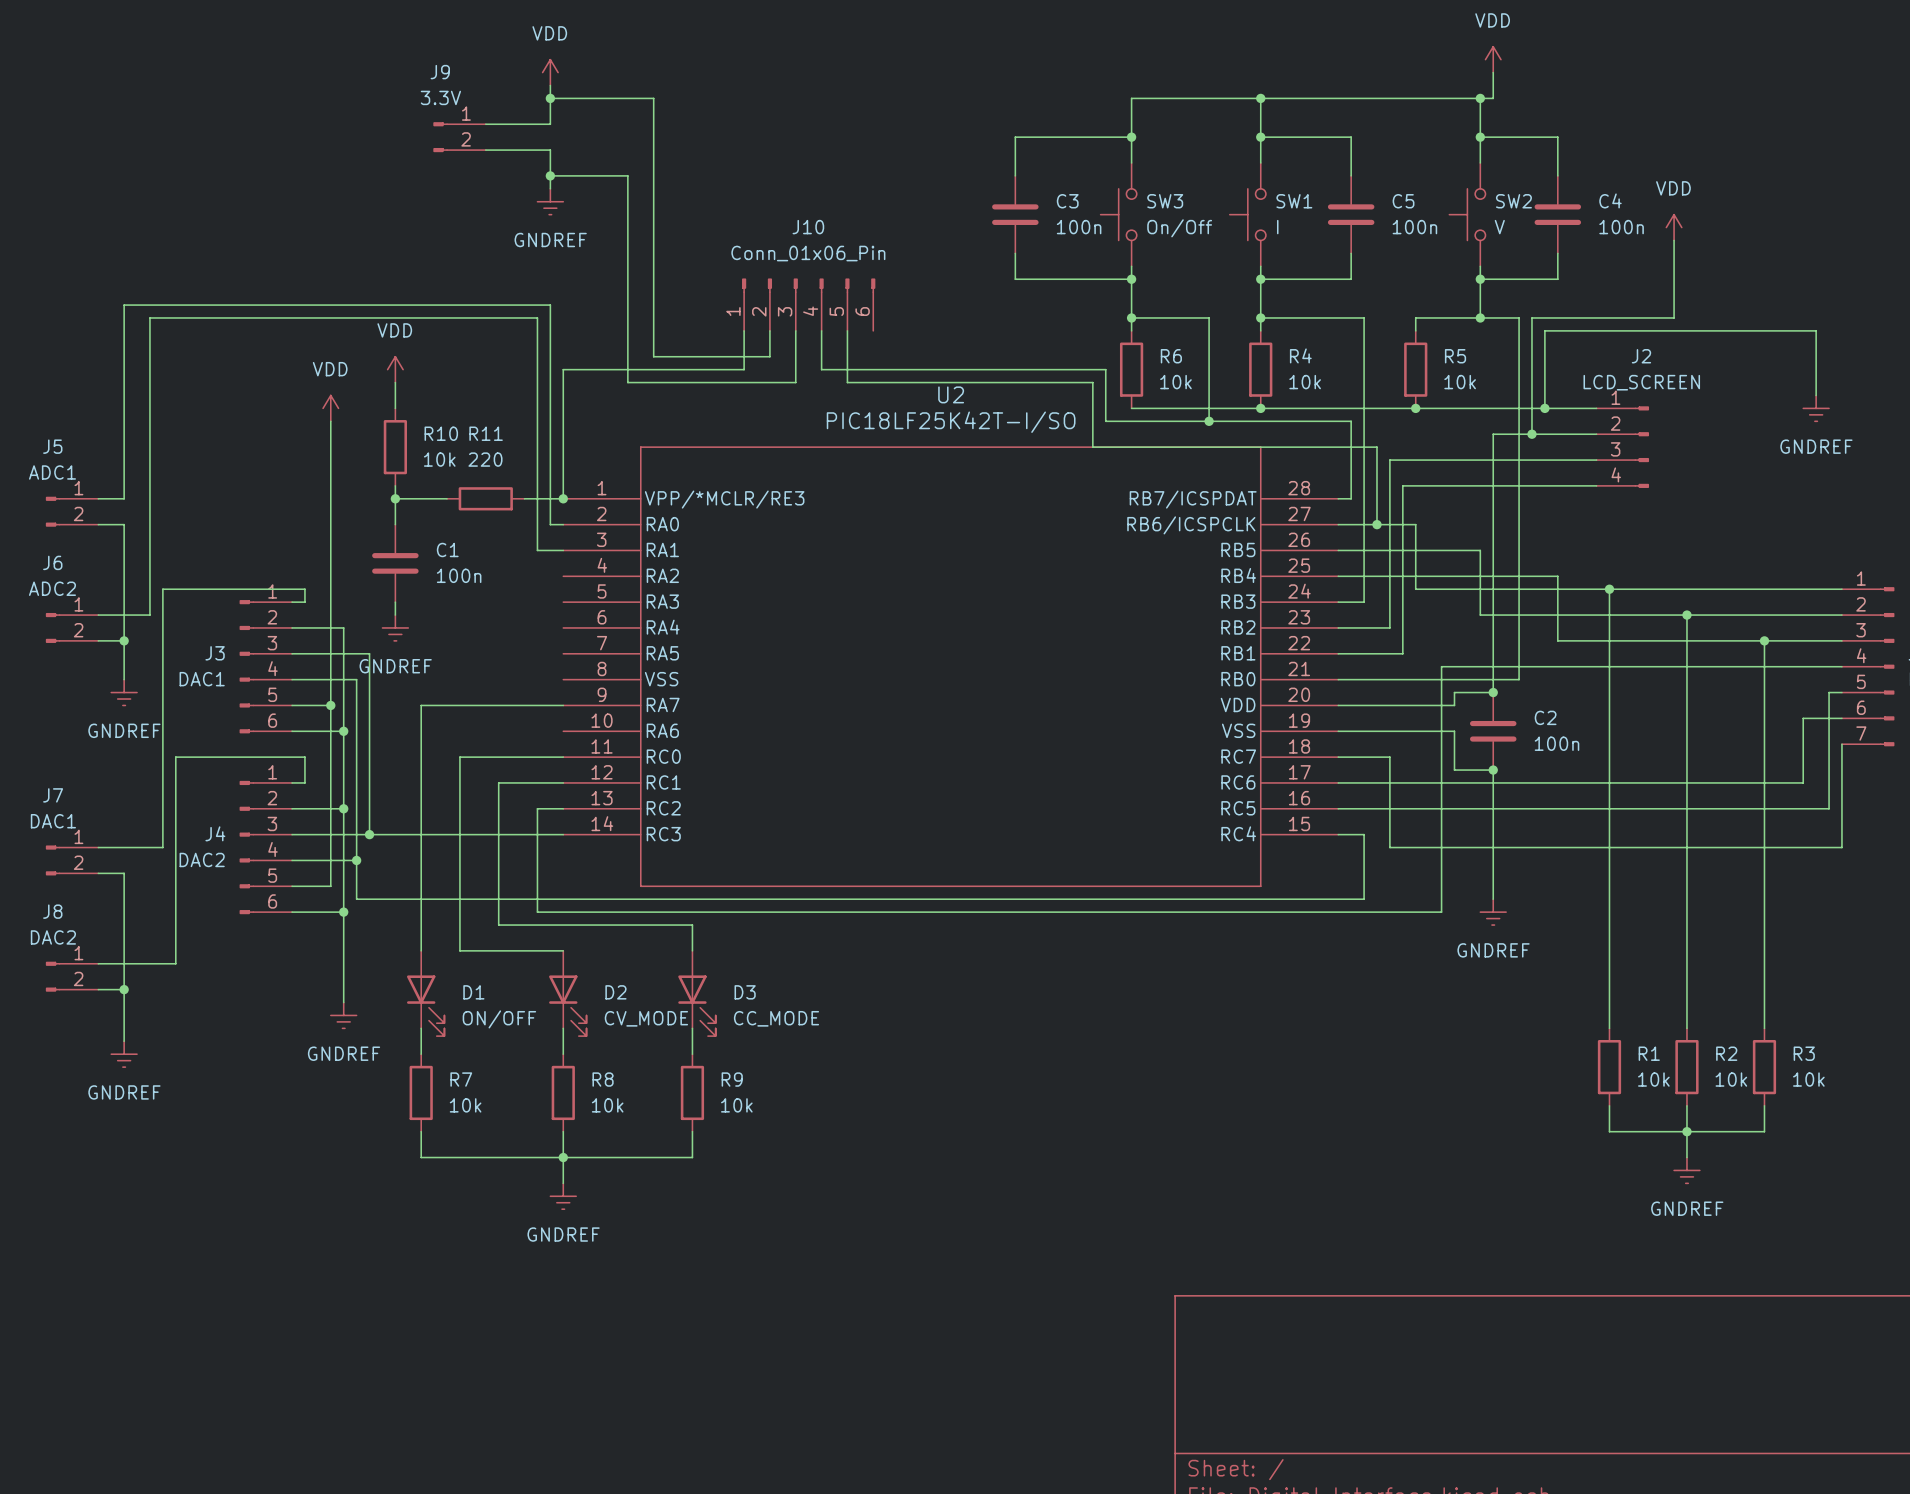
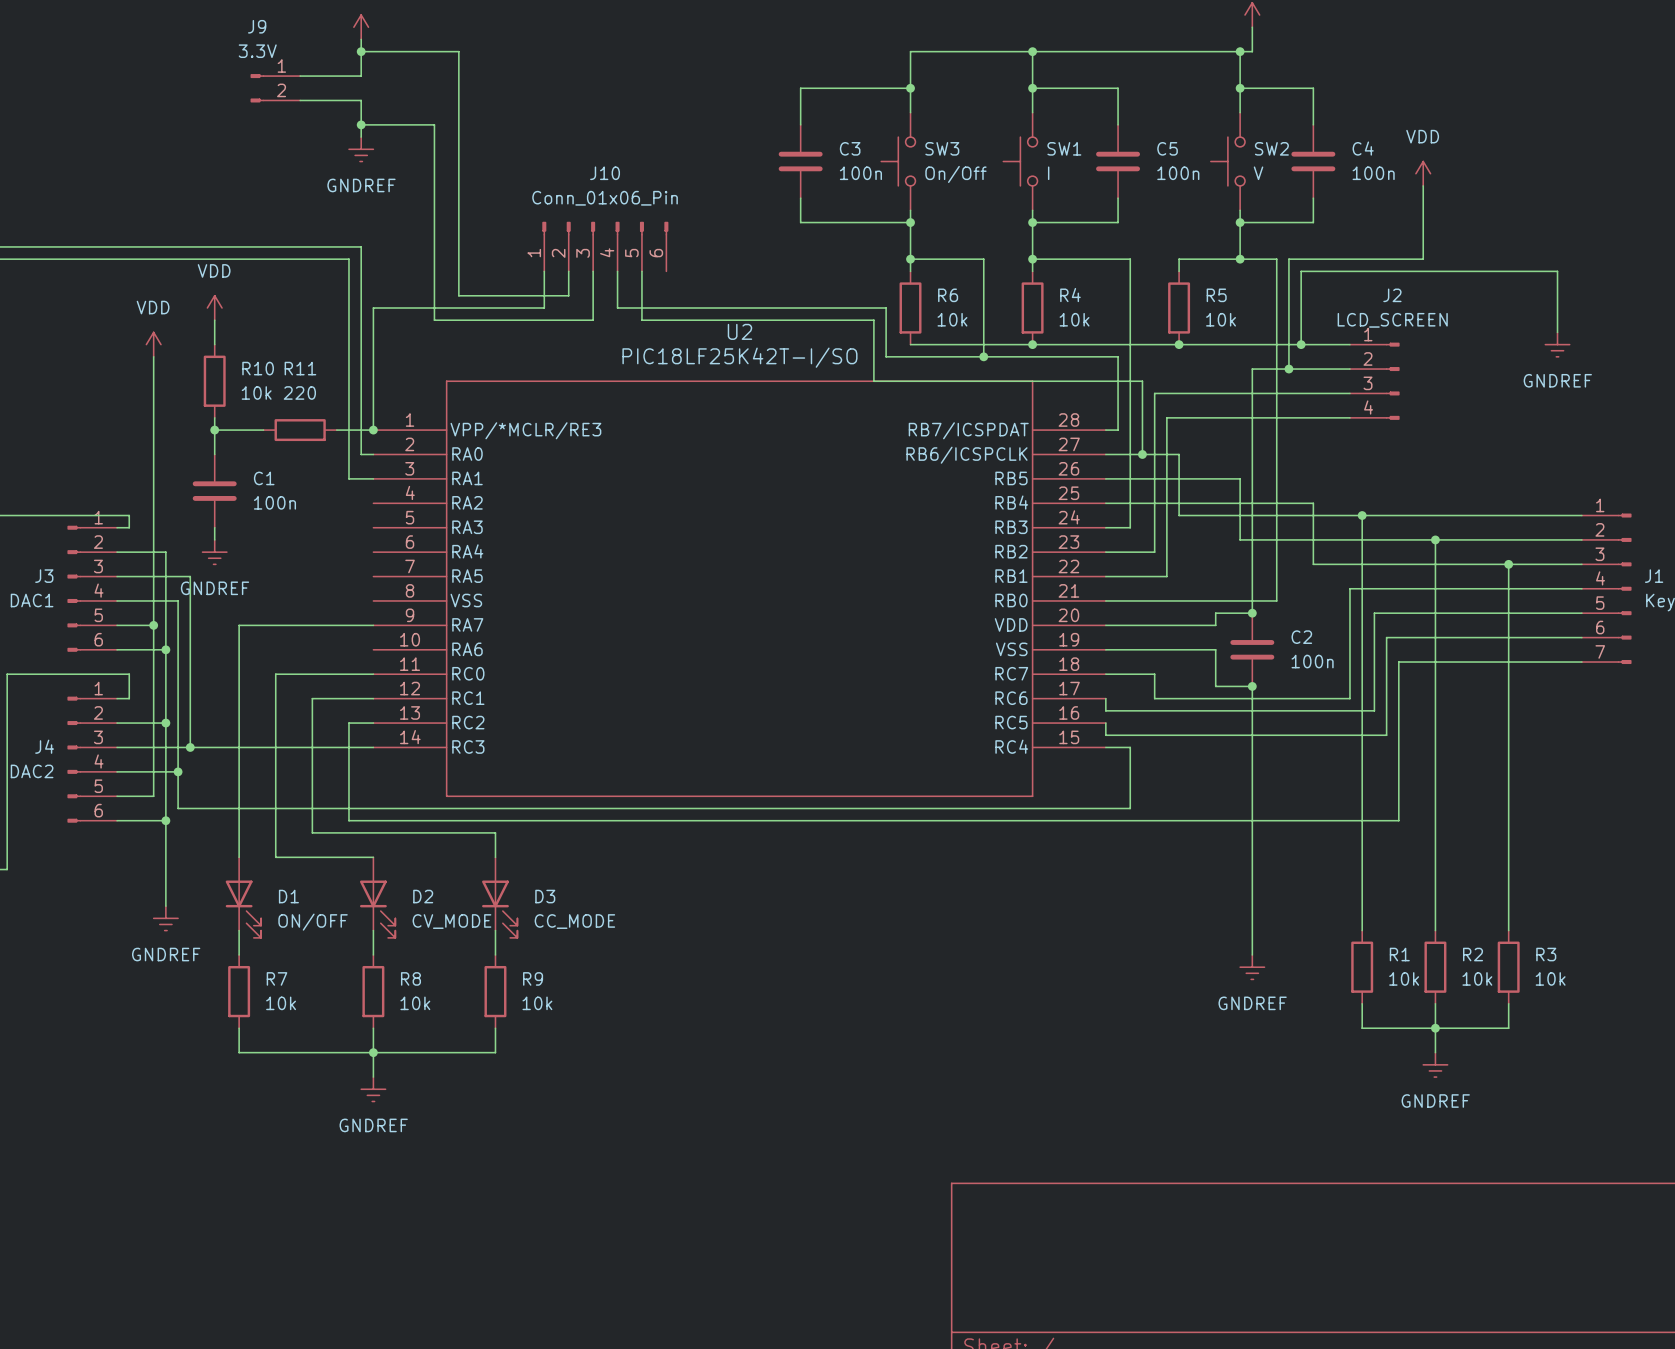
wire: (1596, 666) (1441, 666) (1441, 912) -> (1349, 588) (1349, 698)
wire: (1829, 692) (1829, 808) (1338, 808) -> (1569, 613) (1374, 613) (1374, 710) (1105, 710) (1105, 698)
wire: (1803, 718) (1803, 782) (1596, 782) -> (1545, 637) (1386, 637) (1386, 735) (1105, 735) (1105, 723)
wire: (1841, 744) (1841, 847) (1389, 847) (1389, 782) (1338, 782) -> (1581, 662) (1398, 662) (1398, 820) (1203, 820)
wire: none -> (1252, 808) (1252, 954)
power symbol position: GNDREF (1493, 912) -> GNDREF (1252, 967)

